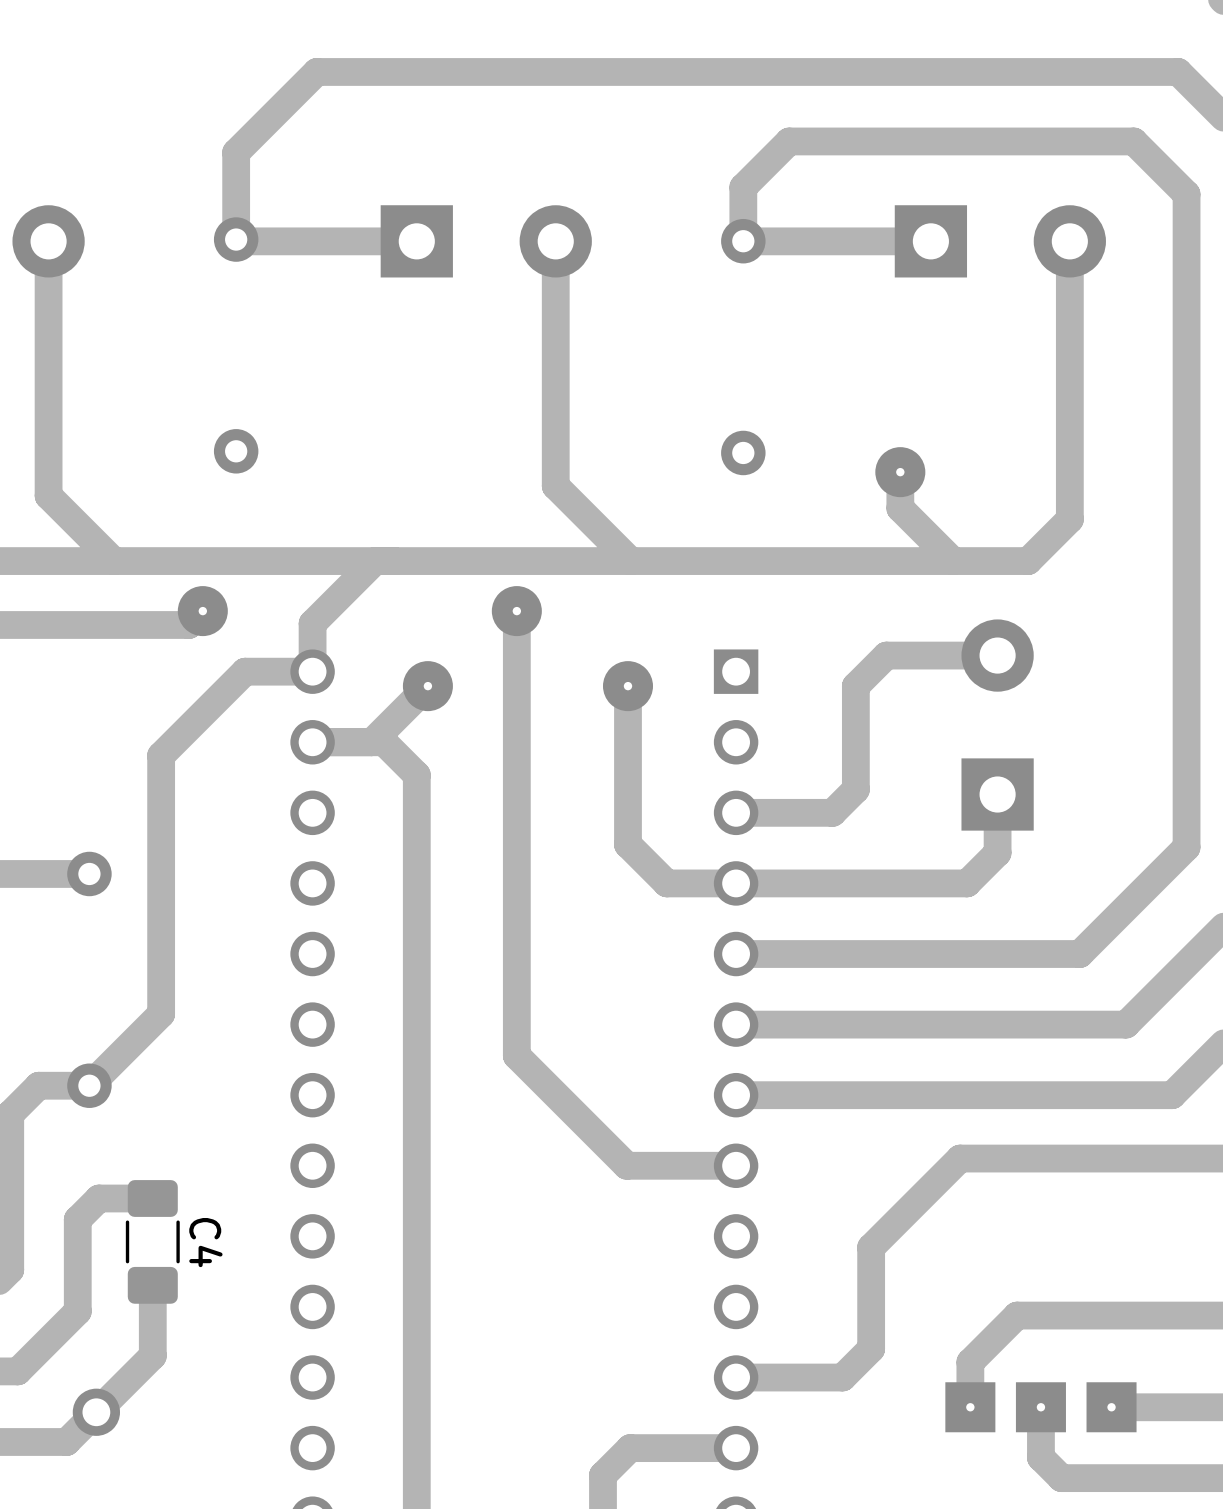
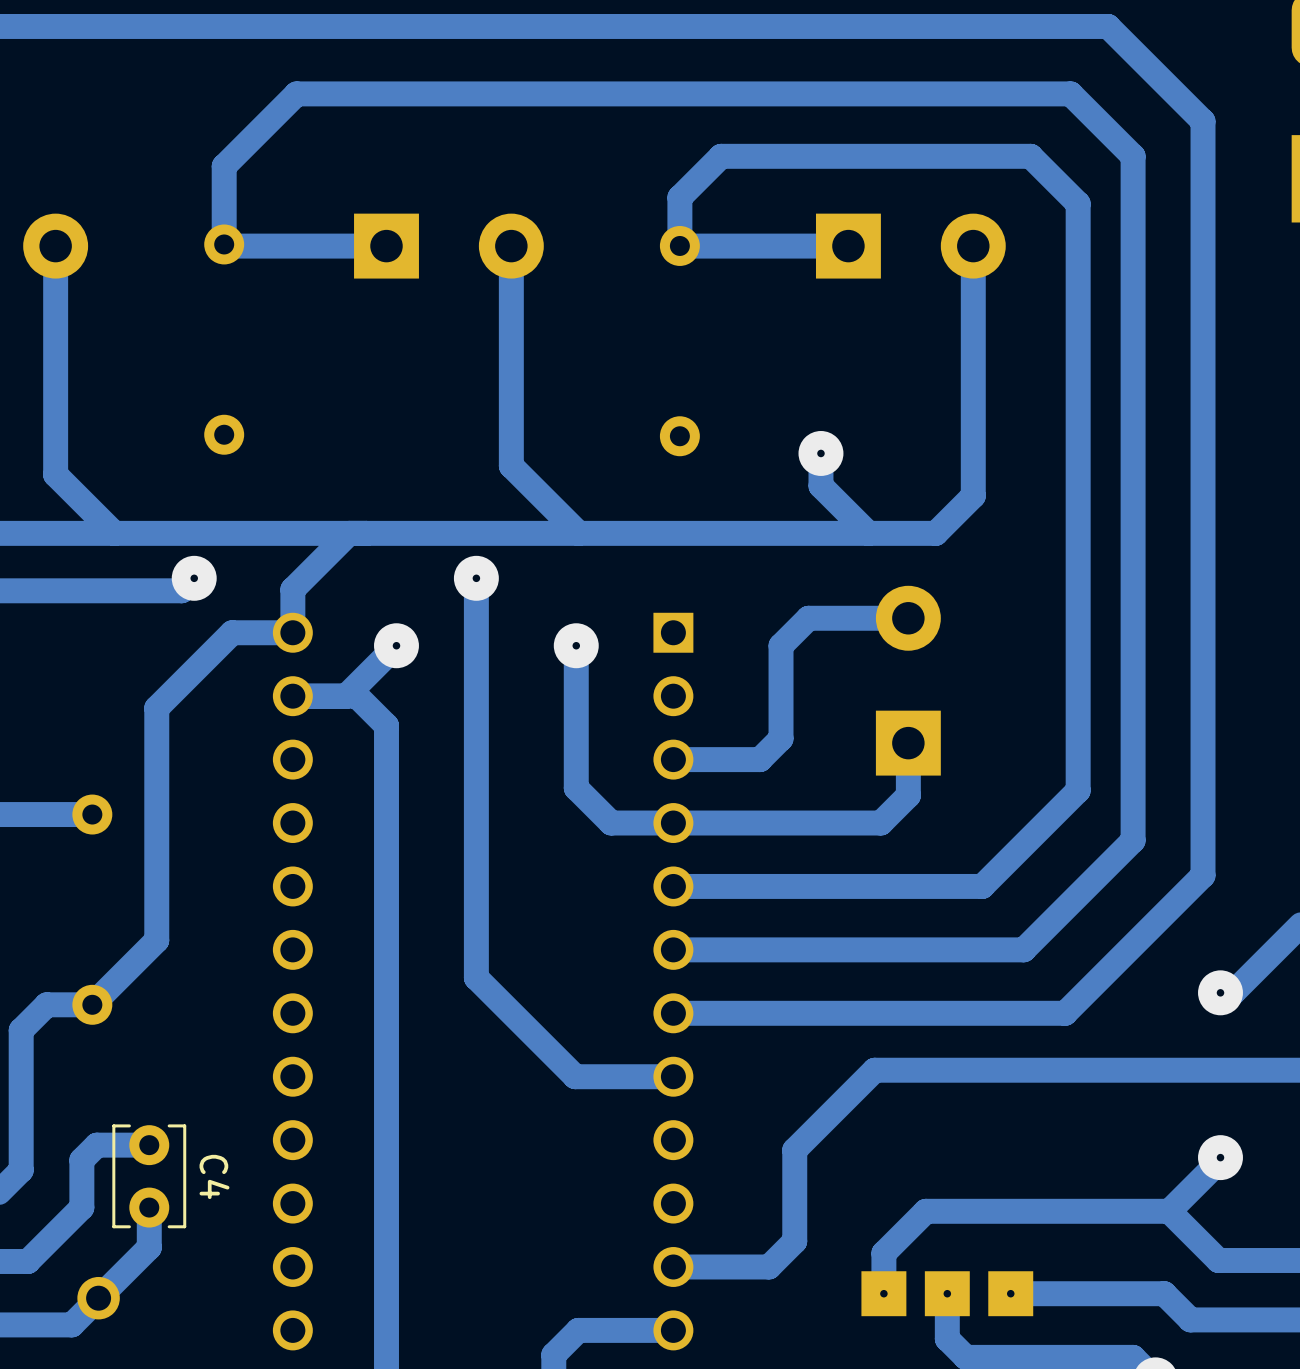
C4 footprint: [125, 1180, 180, 1304] -> [112, 1124, 187, 1229]
track: (152, 1198) (98, 1198) (77, 1219) (77, 1258) -> (149, 1145) (96, 1145) (81, 1160)

